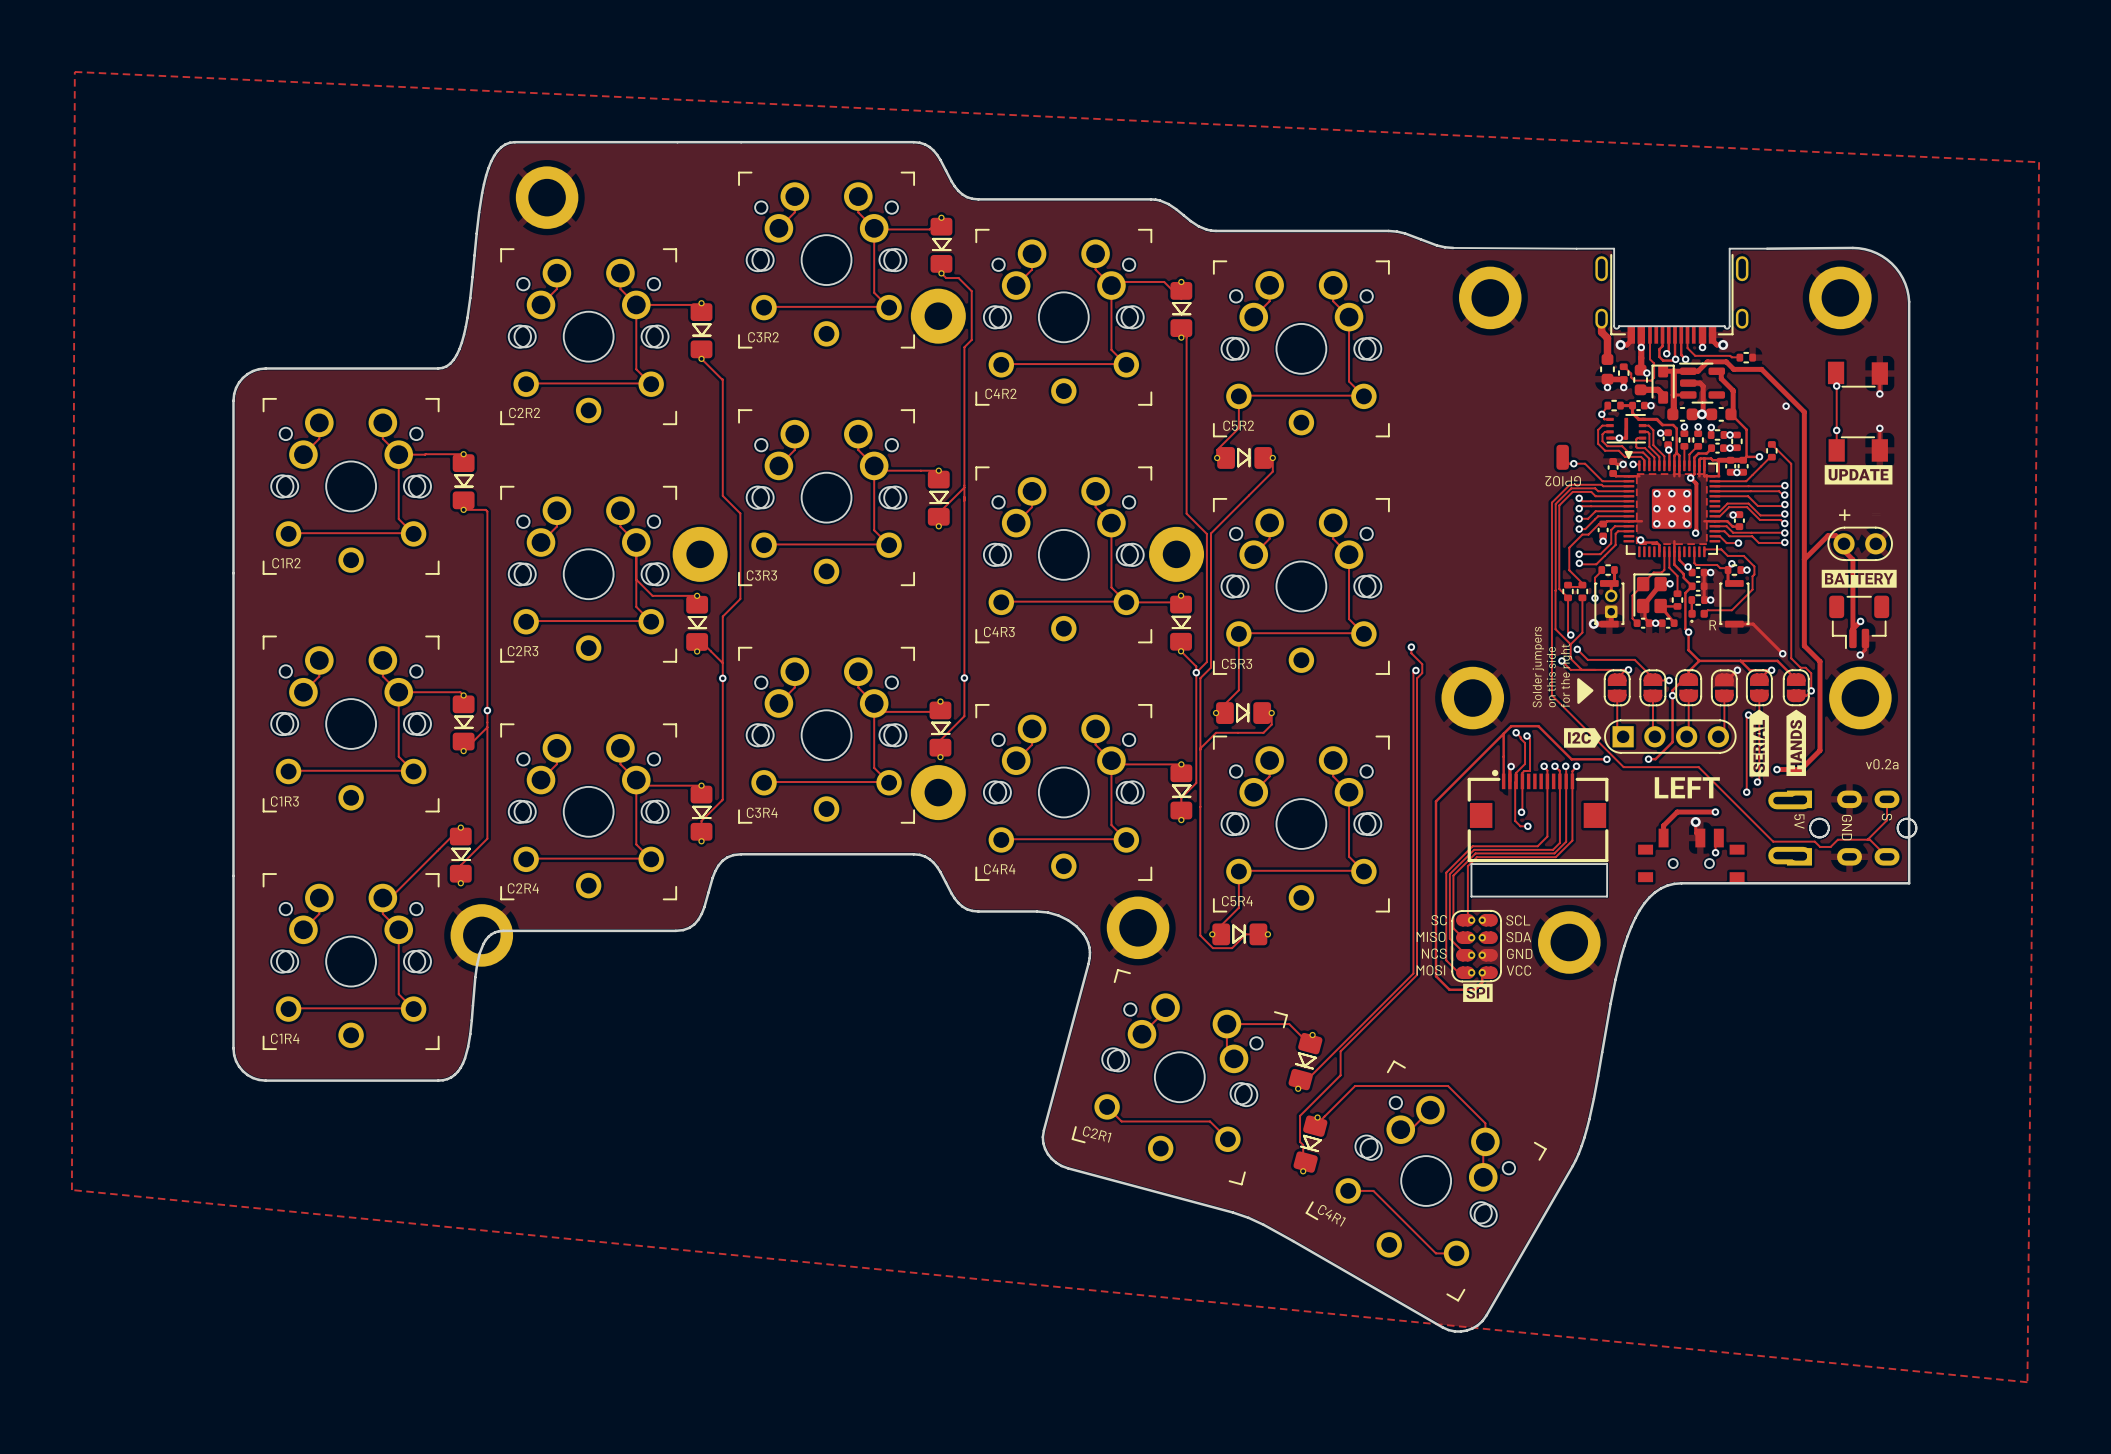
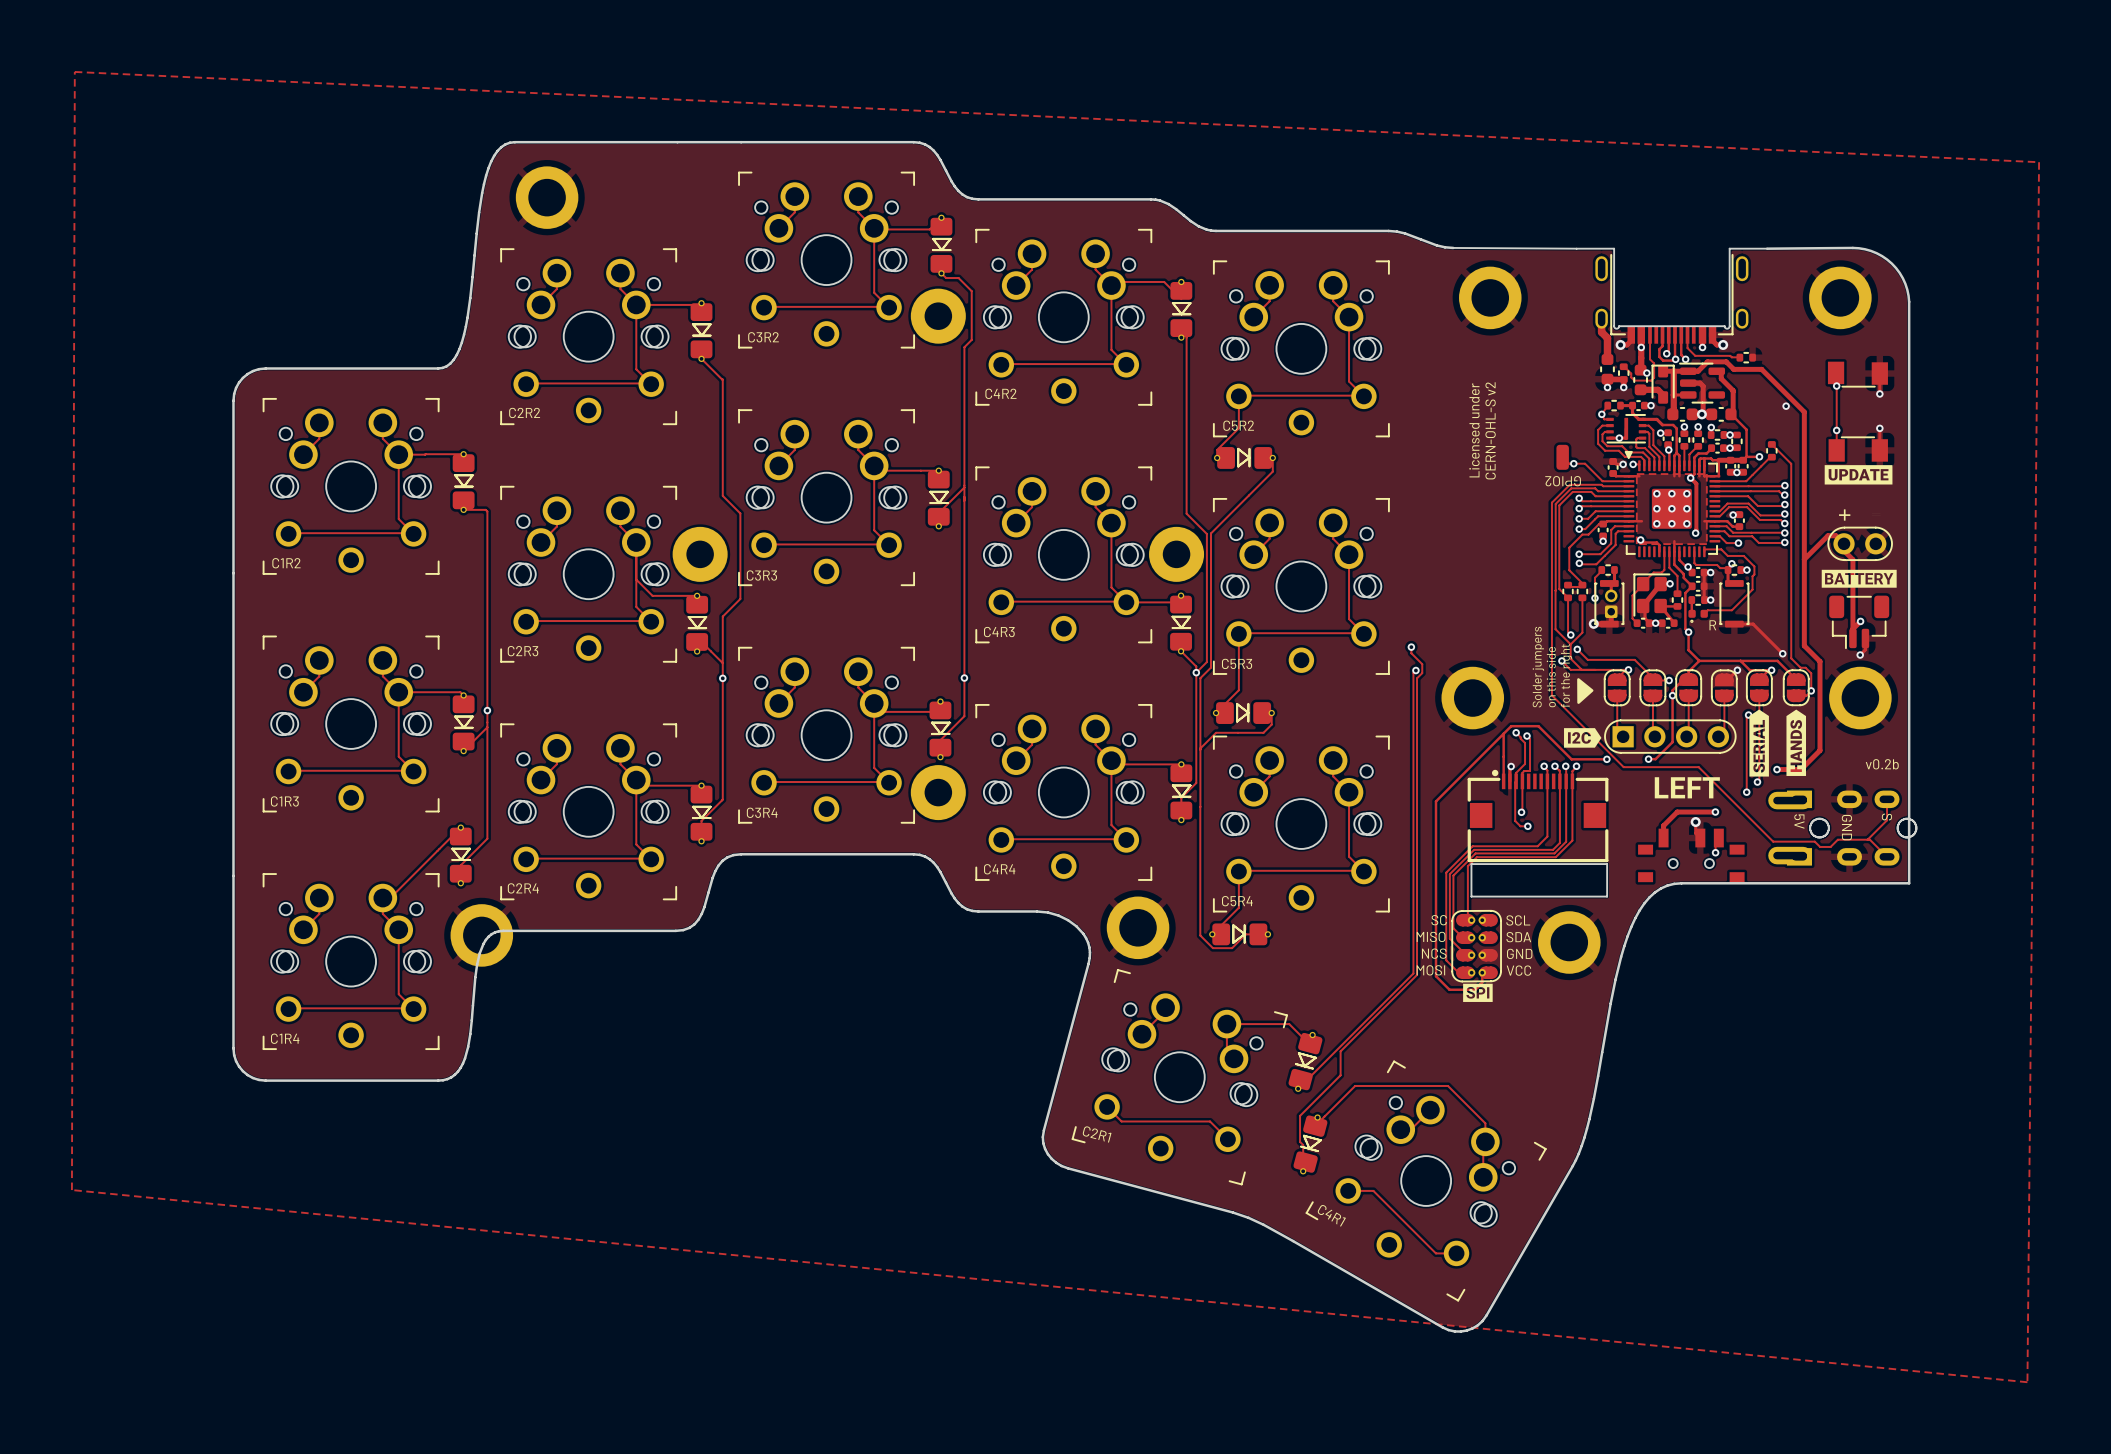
text: none -> Licensed under (1474, 430)
text: none -> CERN-OHL-S v2 (1490, 430)
text: v0.2a (1882, 764) -> v0.2b (1882, 764)

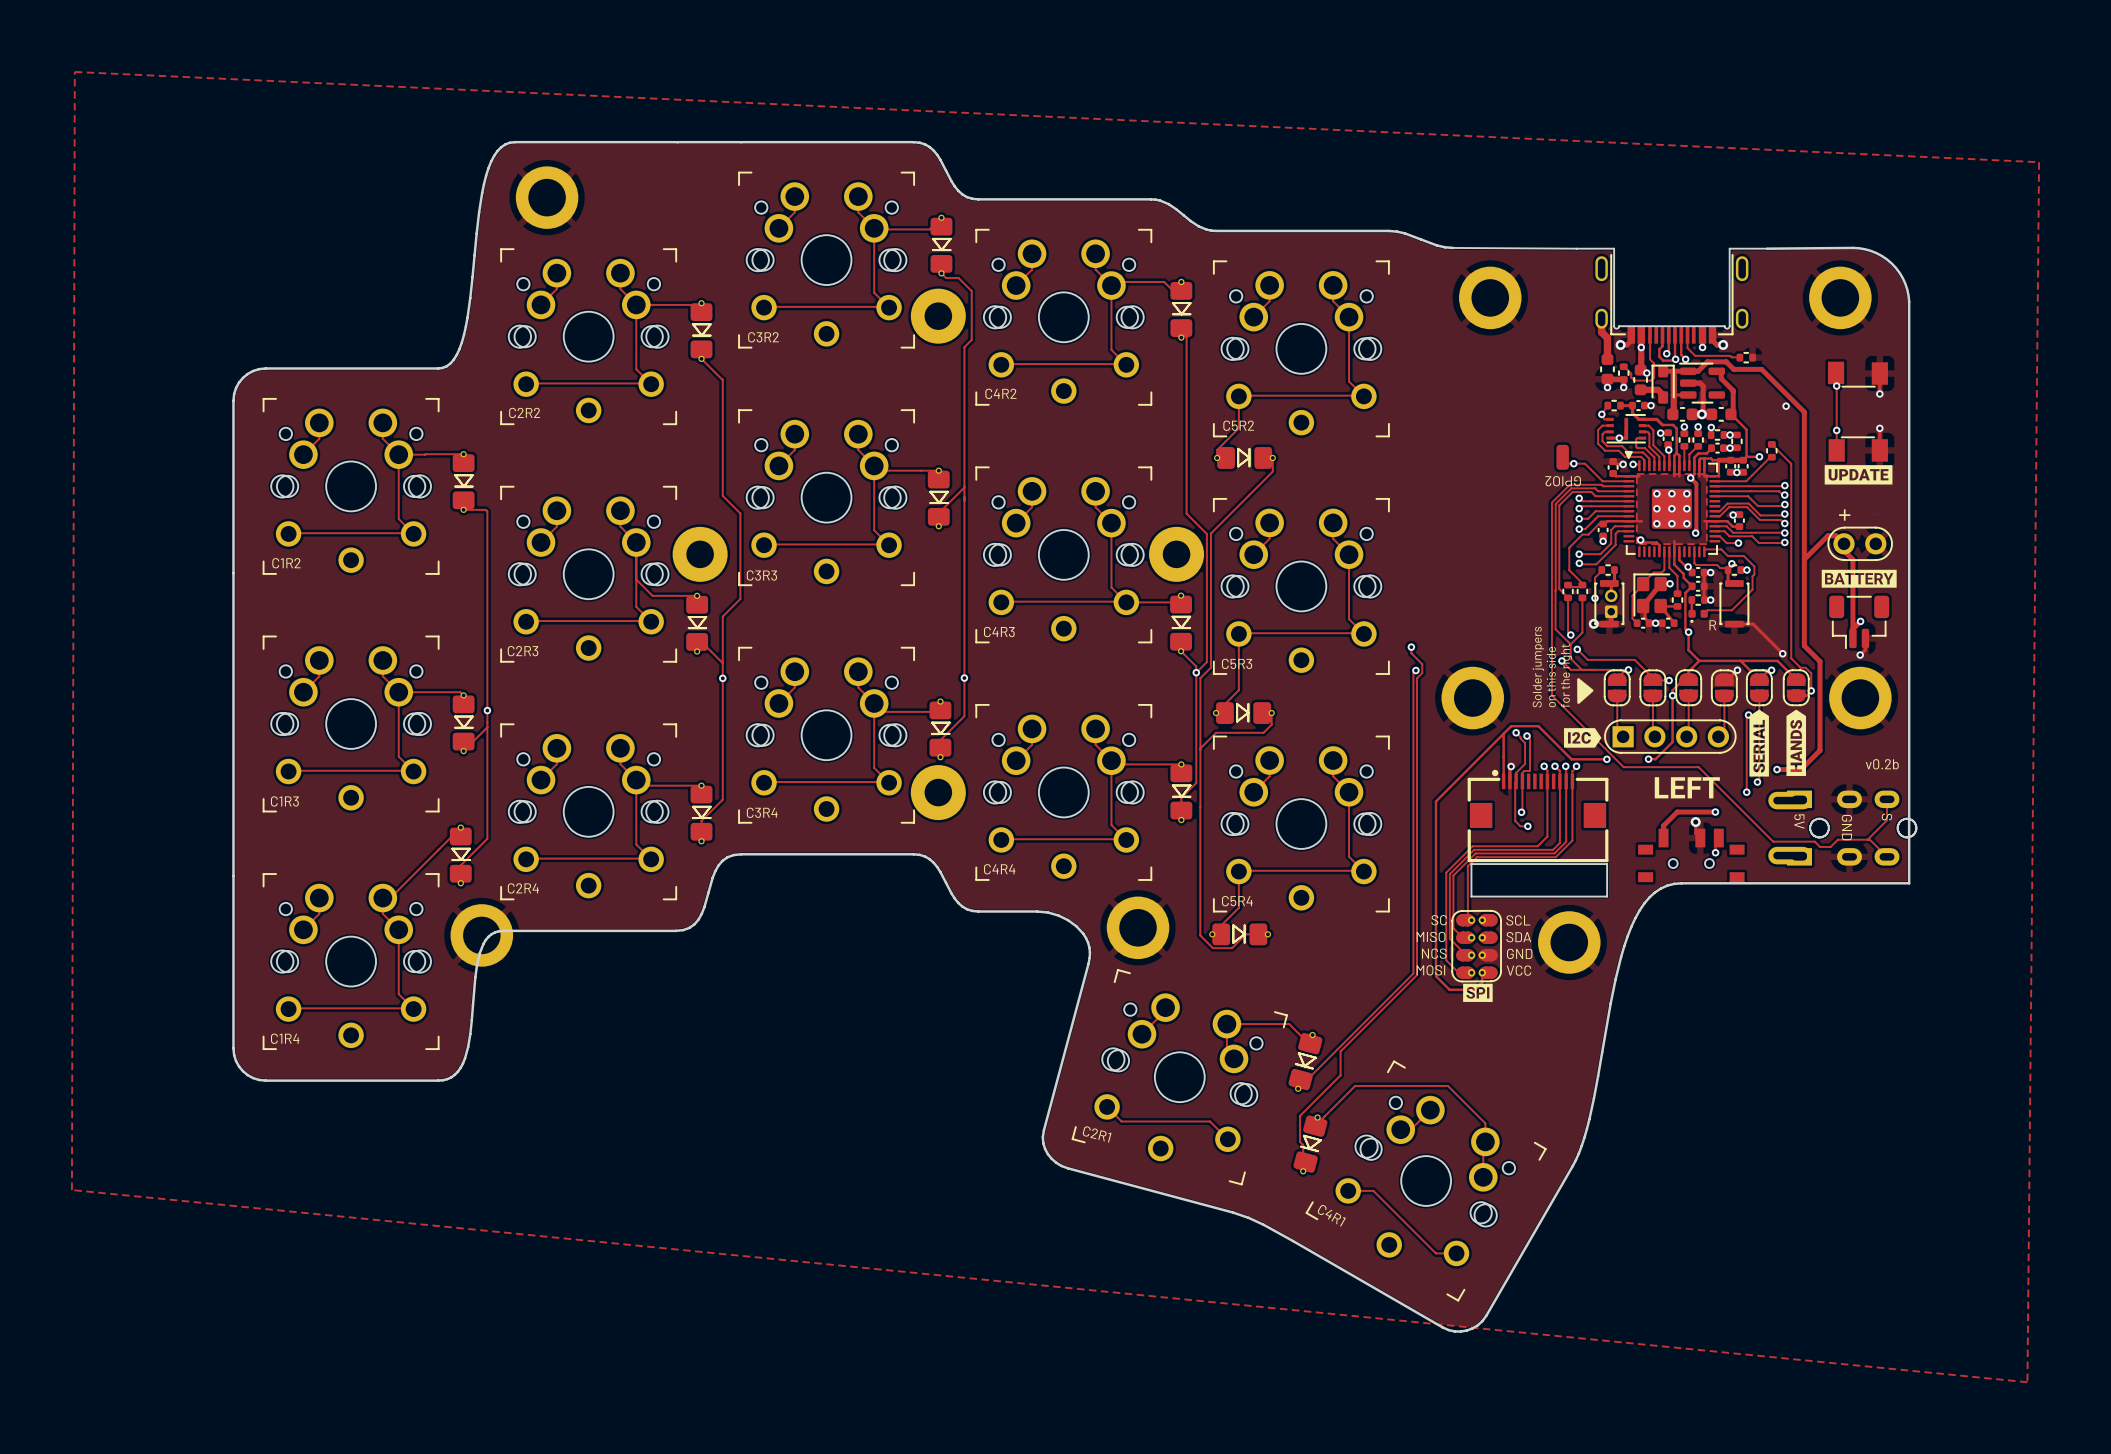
text: Licensed under (1474, 430) -> none
text: CERN-OHL-S v2 (1490, 430) -> none

